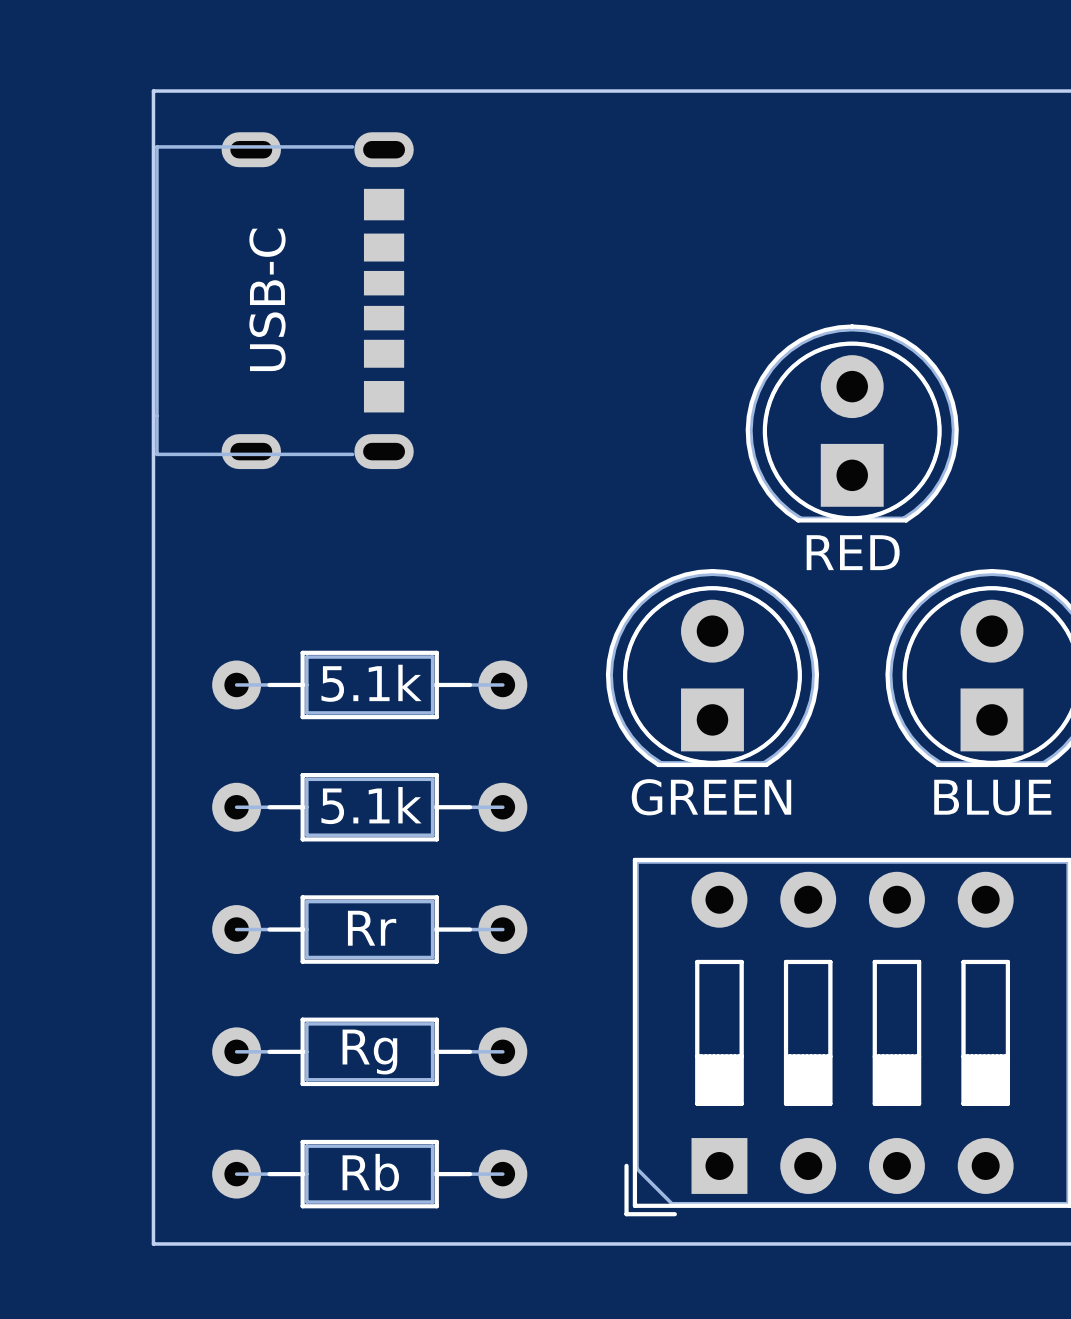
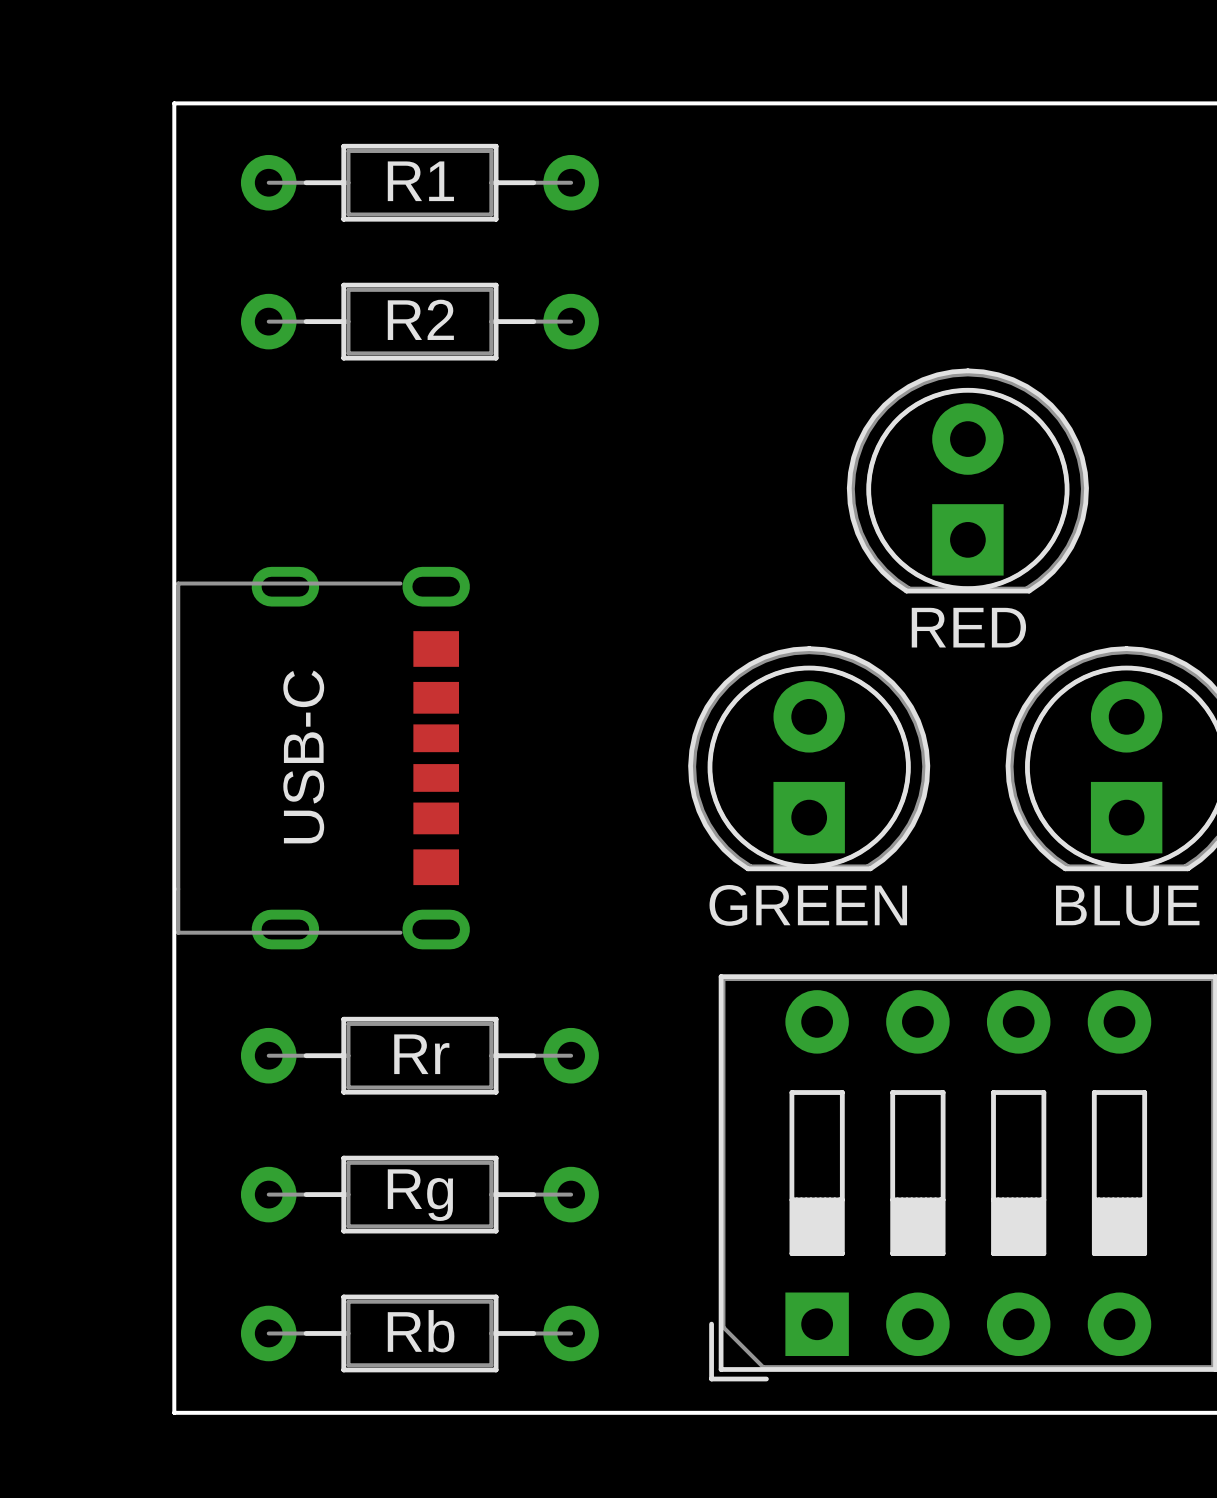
R1: none -> (419, 182)
R2: none -> (419, 321)
USB-C position: (284, 300) -> (323, 758)
part: 5.1k (369, 684) -> none
part: 5.1k (369, 807) -> none

